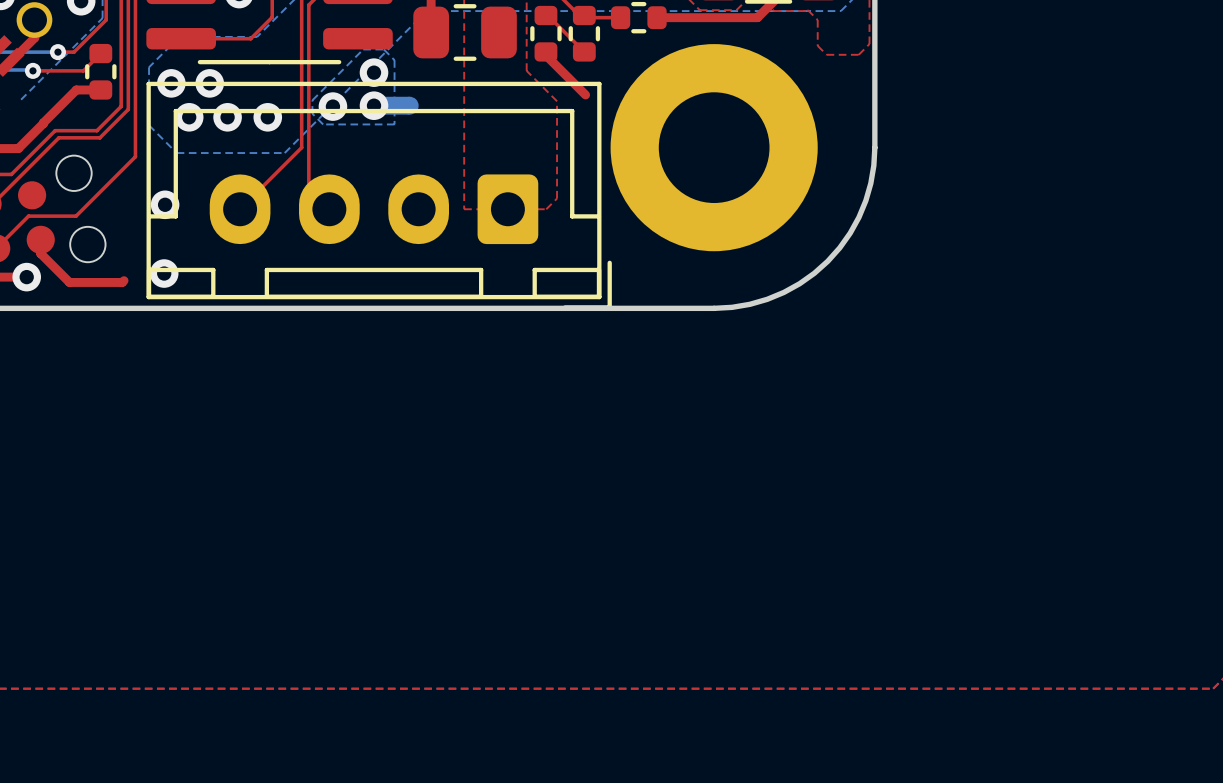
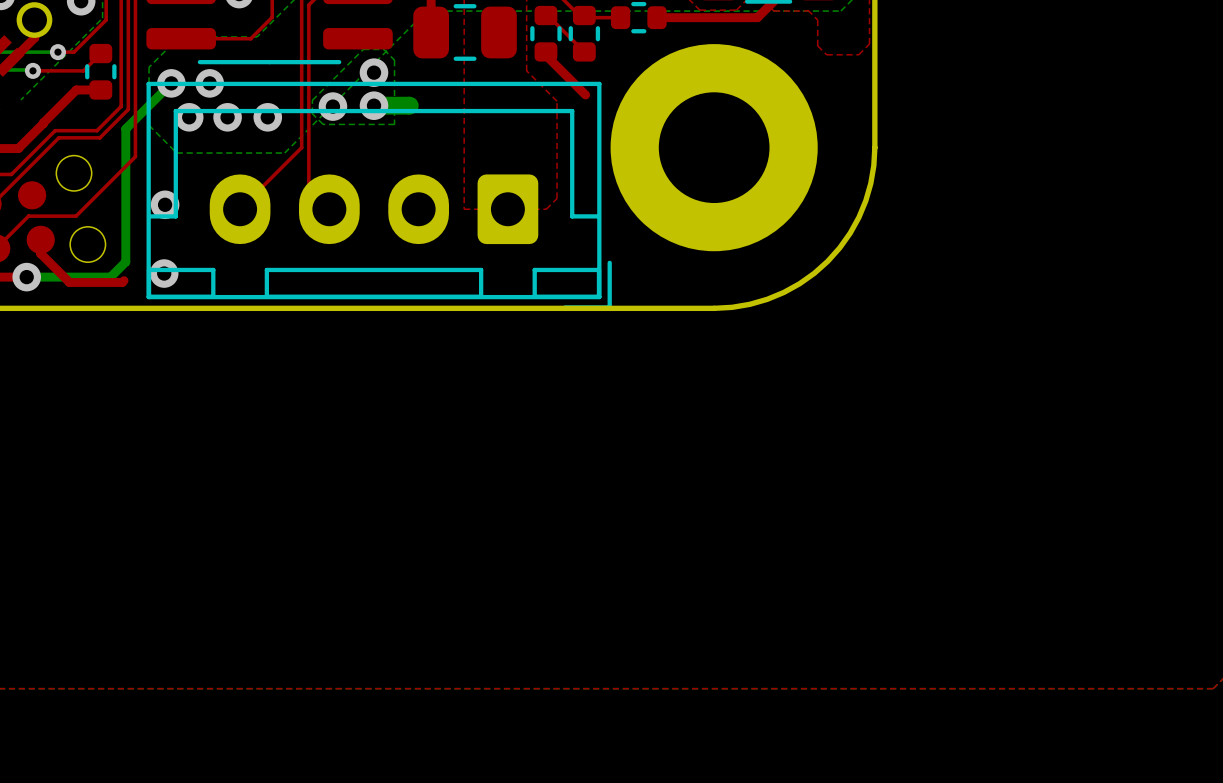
bottom track: none -> (171, 83) (125, 128) (125, 261) (110, 277) (26, 277)

